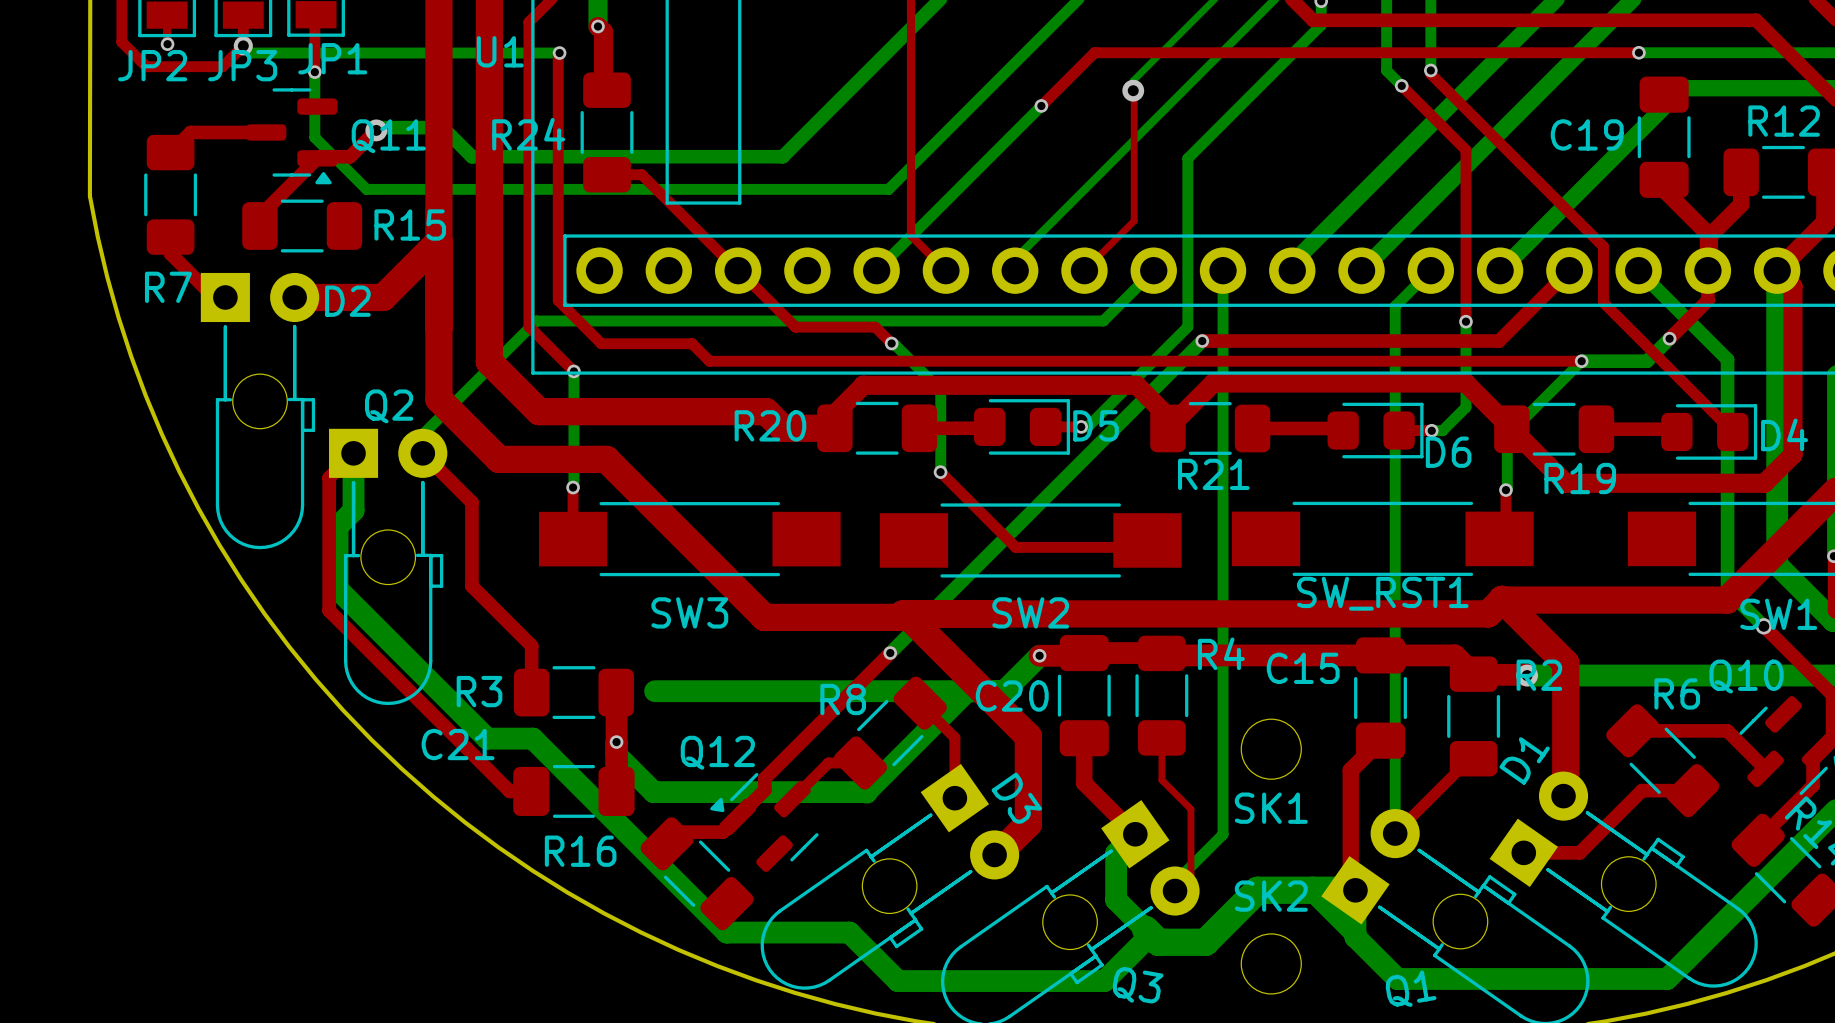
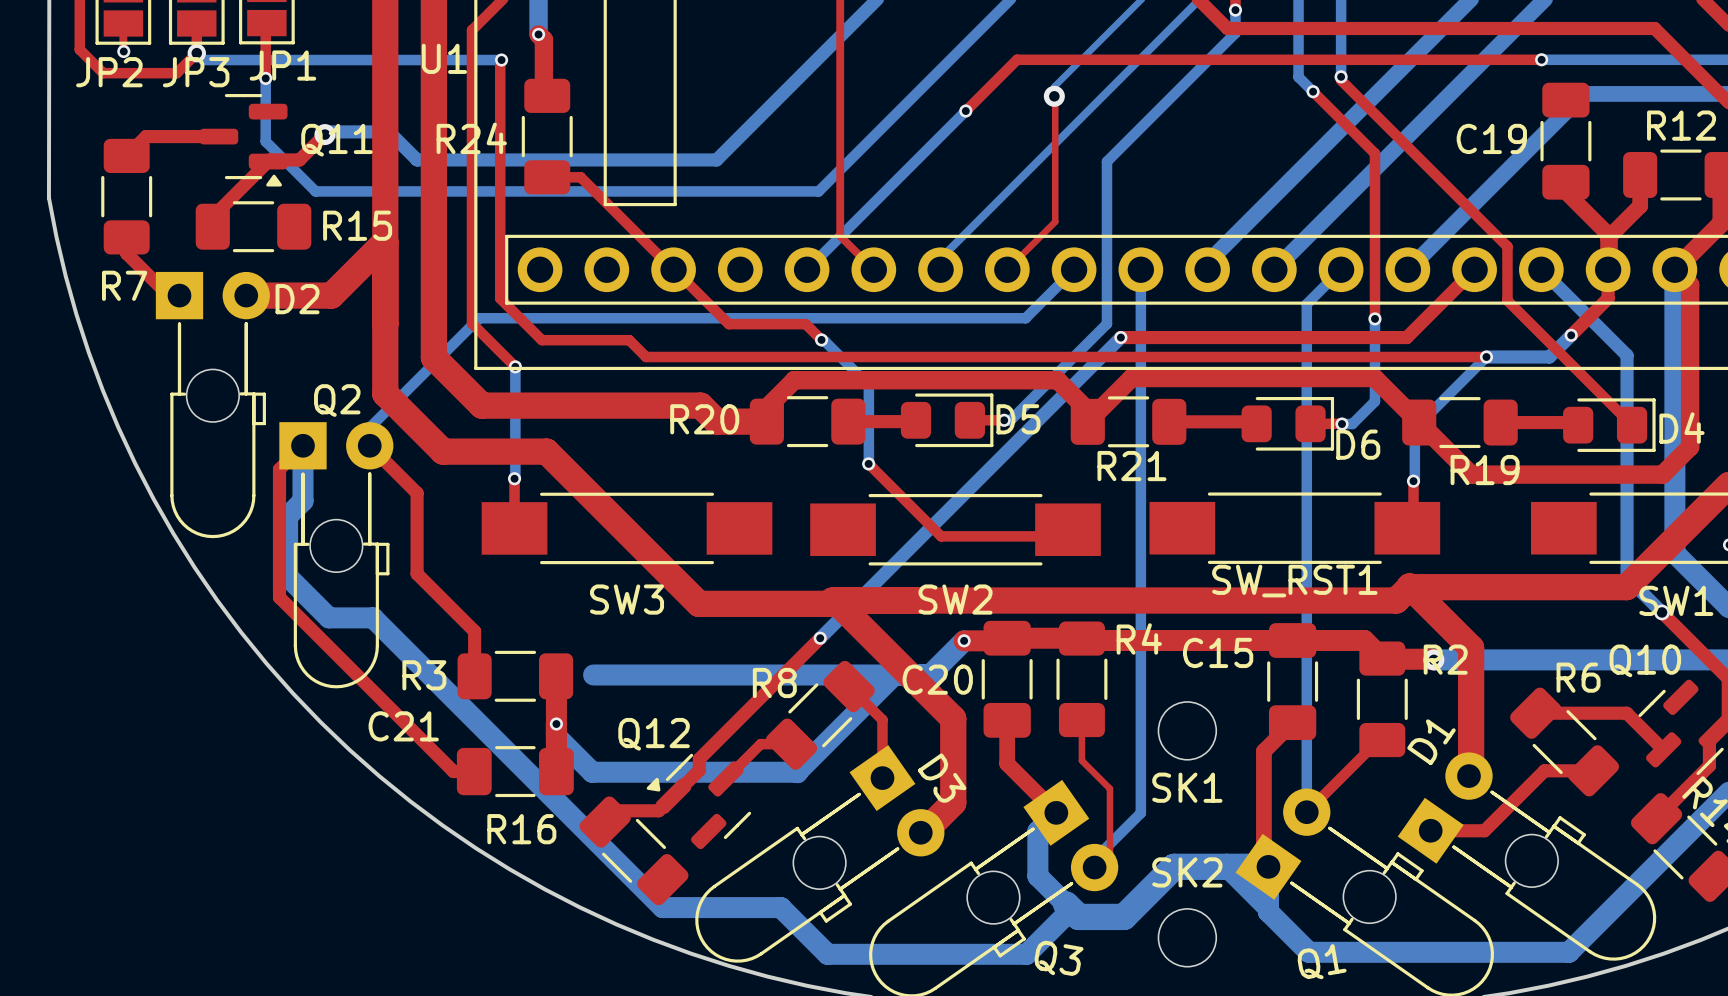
bottom track: (380, 631) (487, 738) (532, 738) -> (328, 617) (373, 617) (475, 720)

